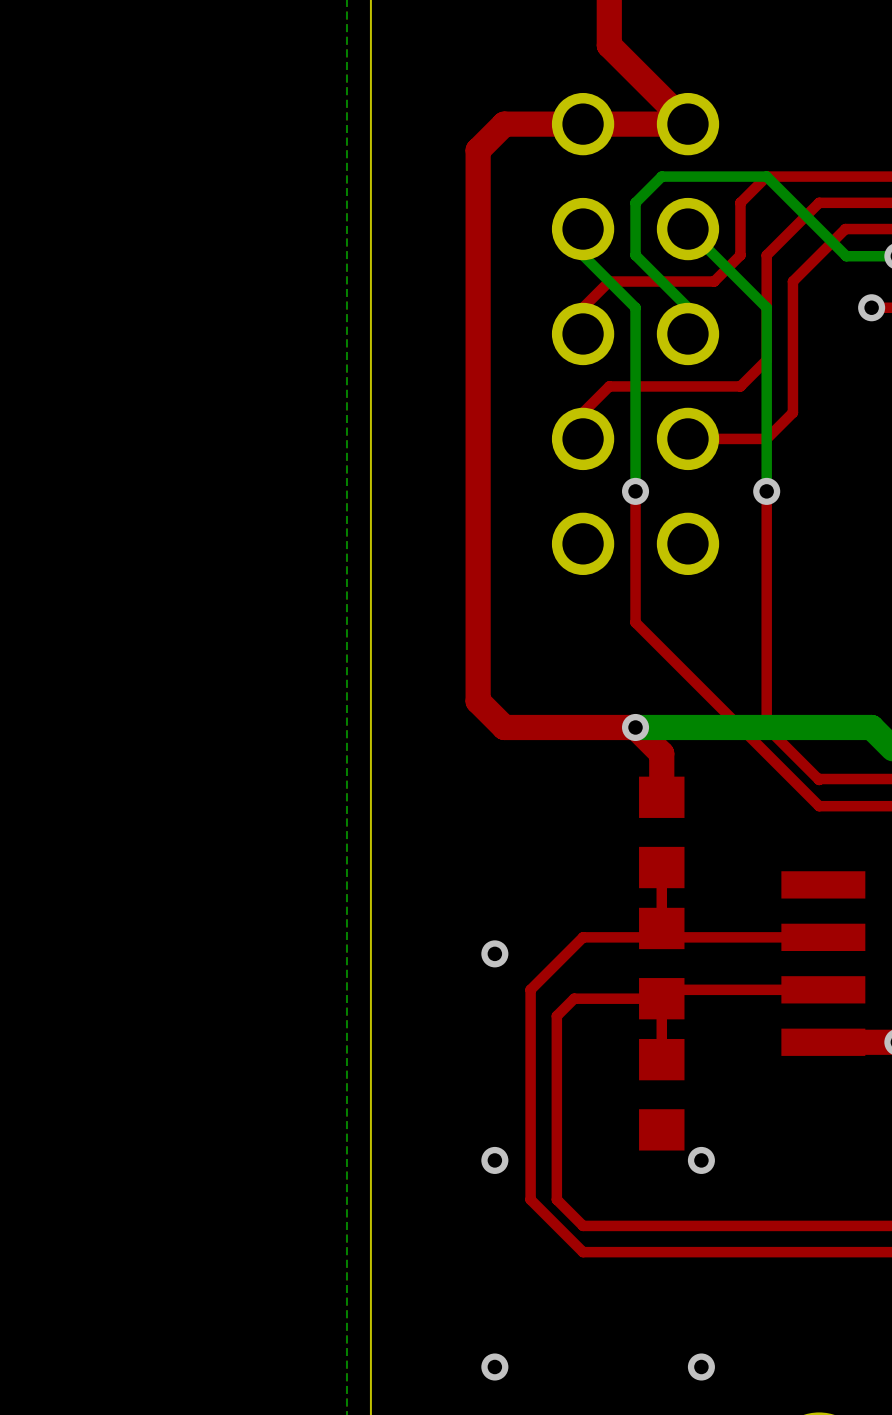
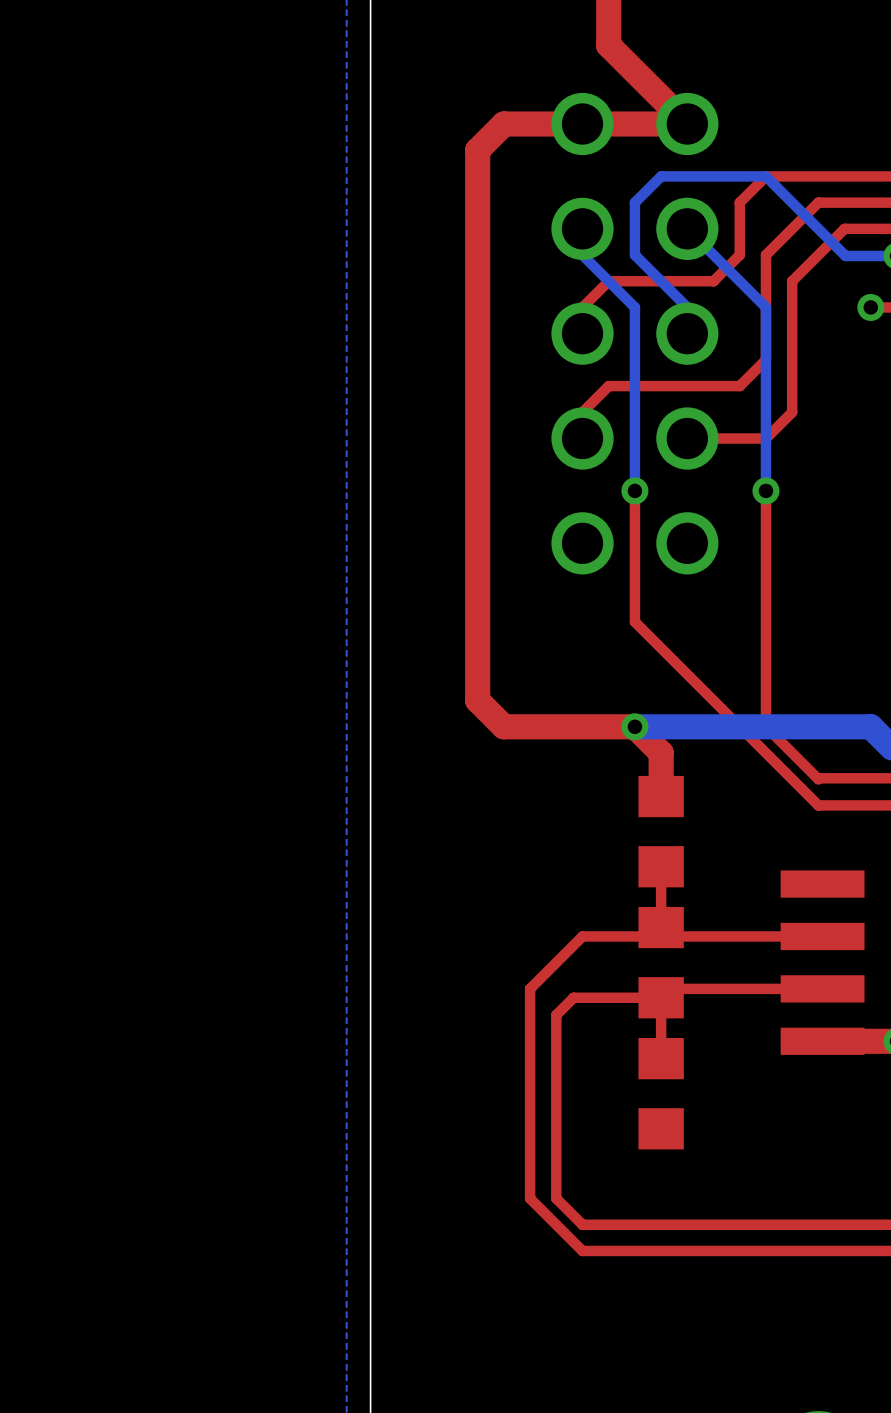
via: (494, 953) -> none
via: (494, 1160) -> none
via: (701, 1160) -> none
via: (494, 1367) -> none
via: (701, 1367) -> none

